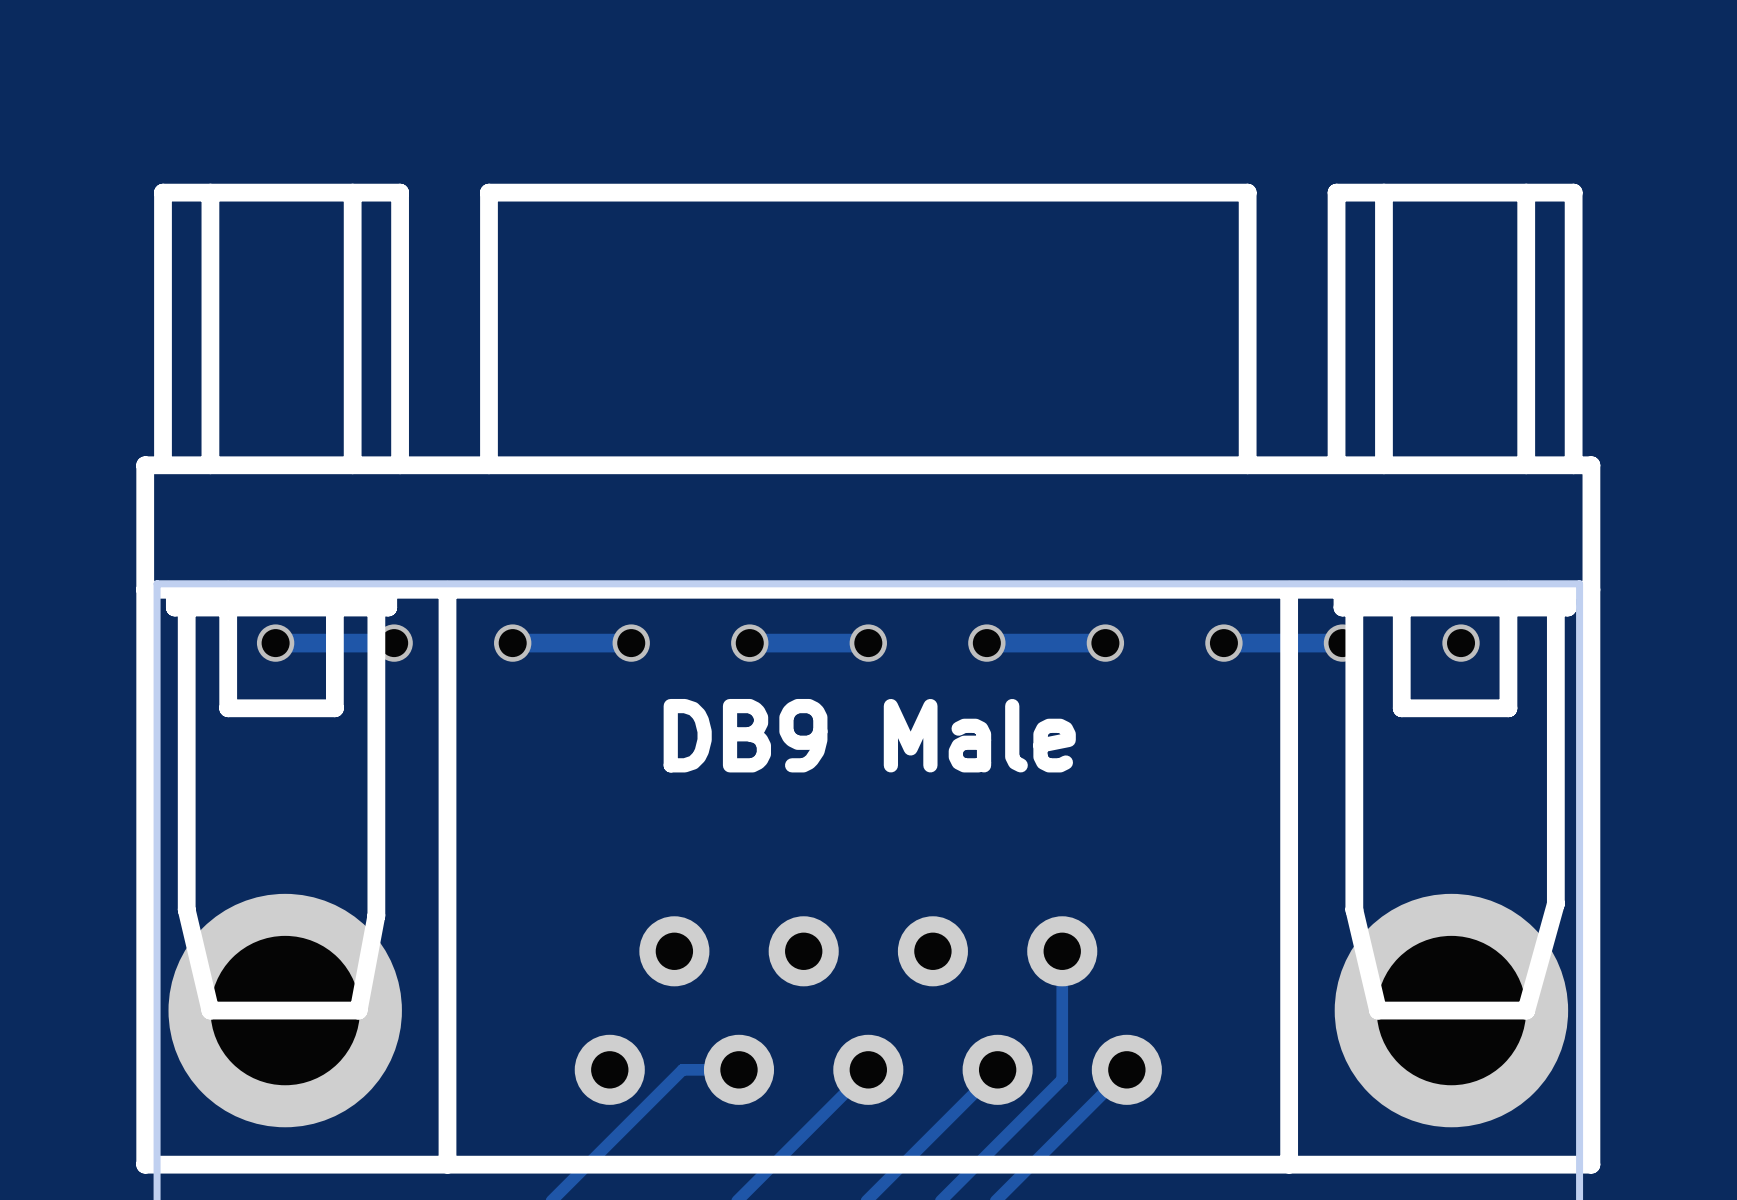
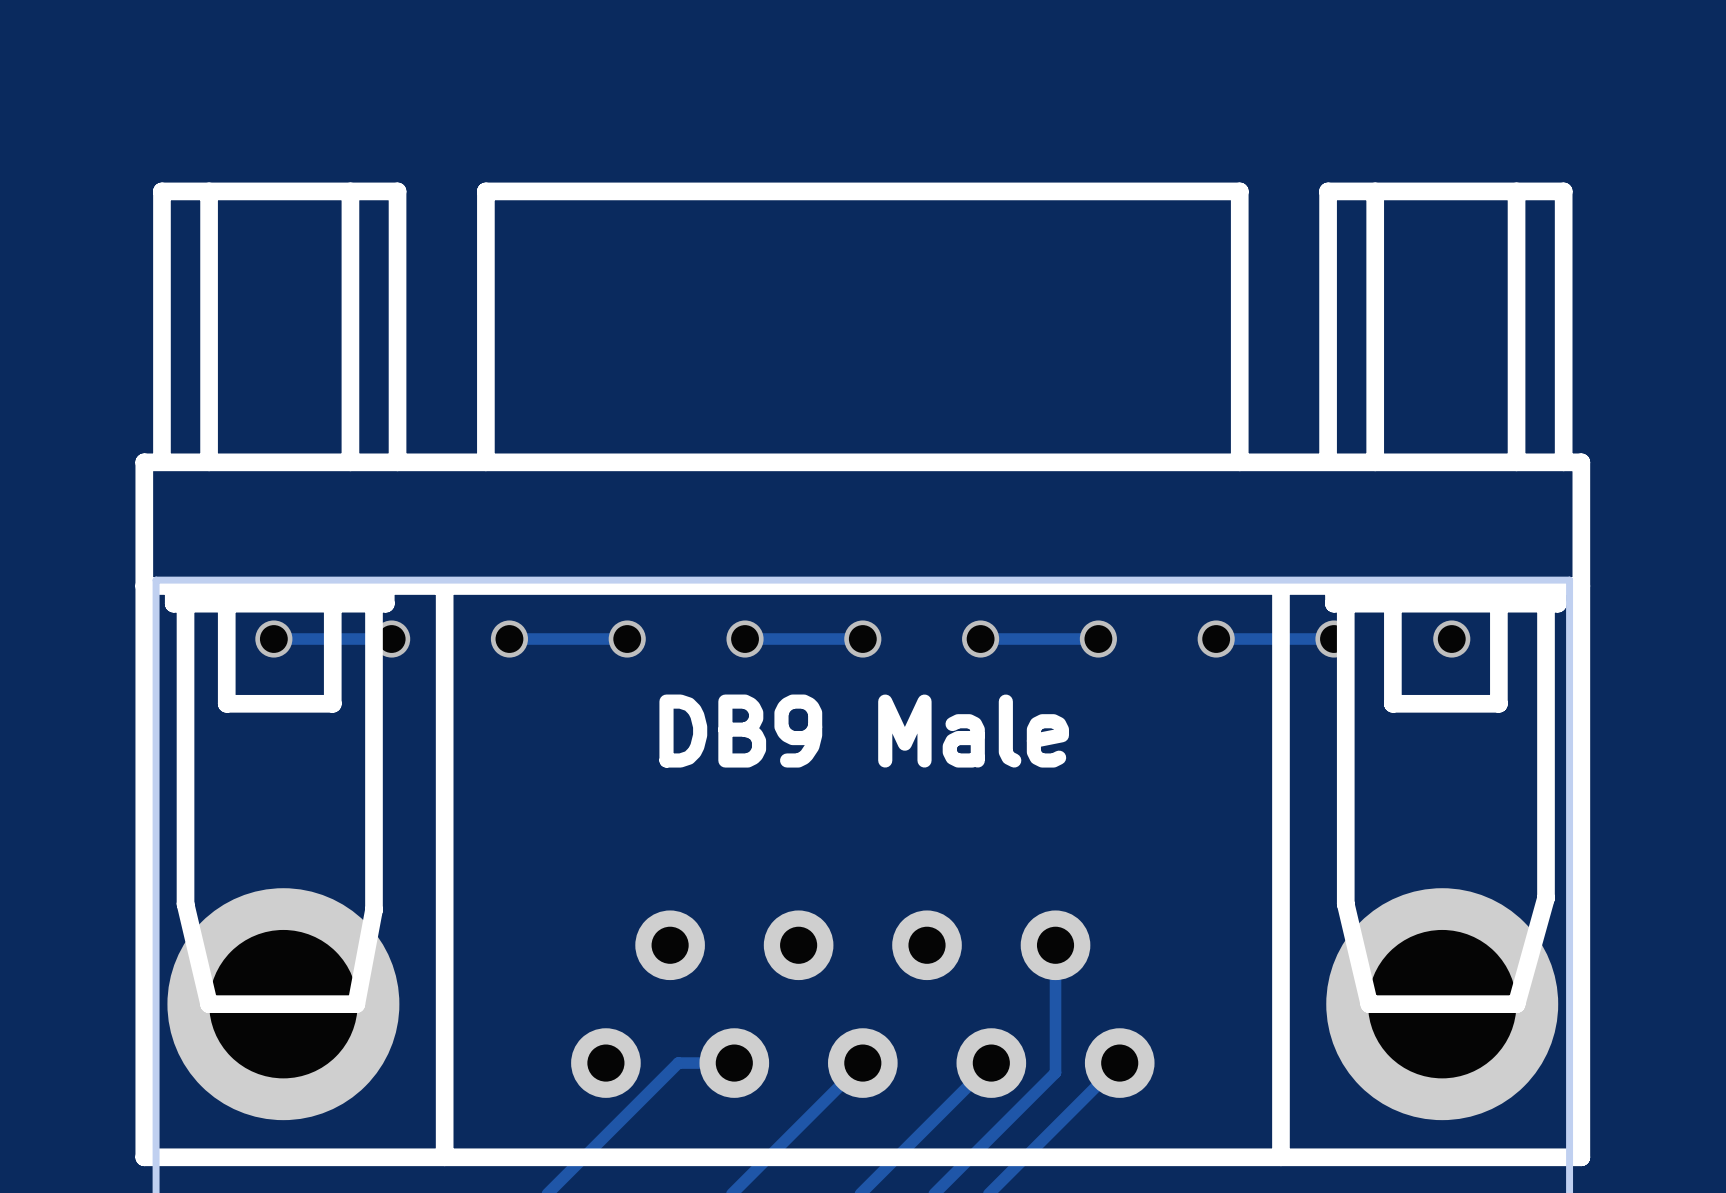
track width: thick (275, 643) (394, 643) -> thin (273, 639) (391, 639)
track width: thick (512, 643) (631, 643) -> thin (509, 639) (627, 639)
track width: thick (749, 643) (868, 643) -> thin (745, 639) (862, 639)
track width: thick (986, 643) (1105, 643) -> thin (980, 639) (1098, 639)
track width: thick (1223, 643) (1342, 643) -> thin (1216, 639) (1333, 639)

